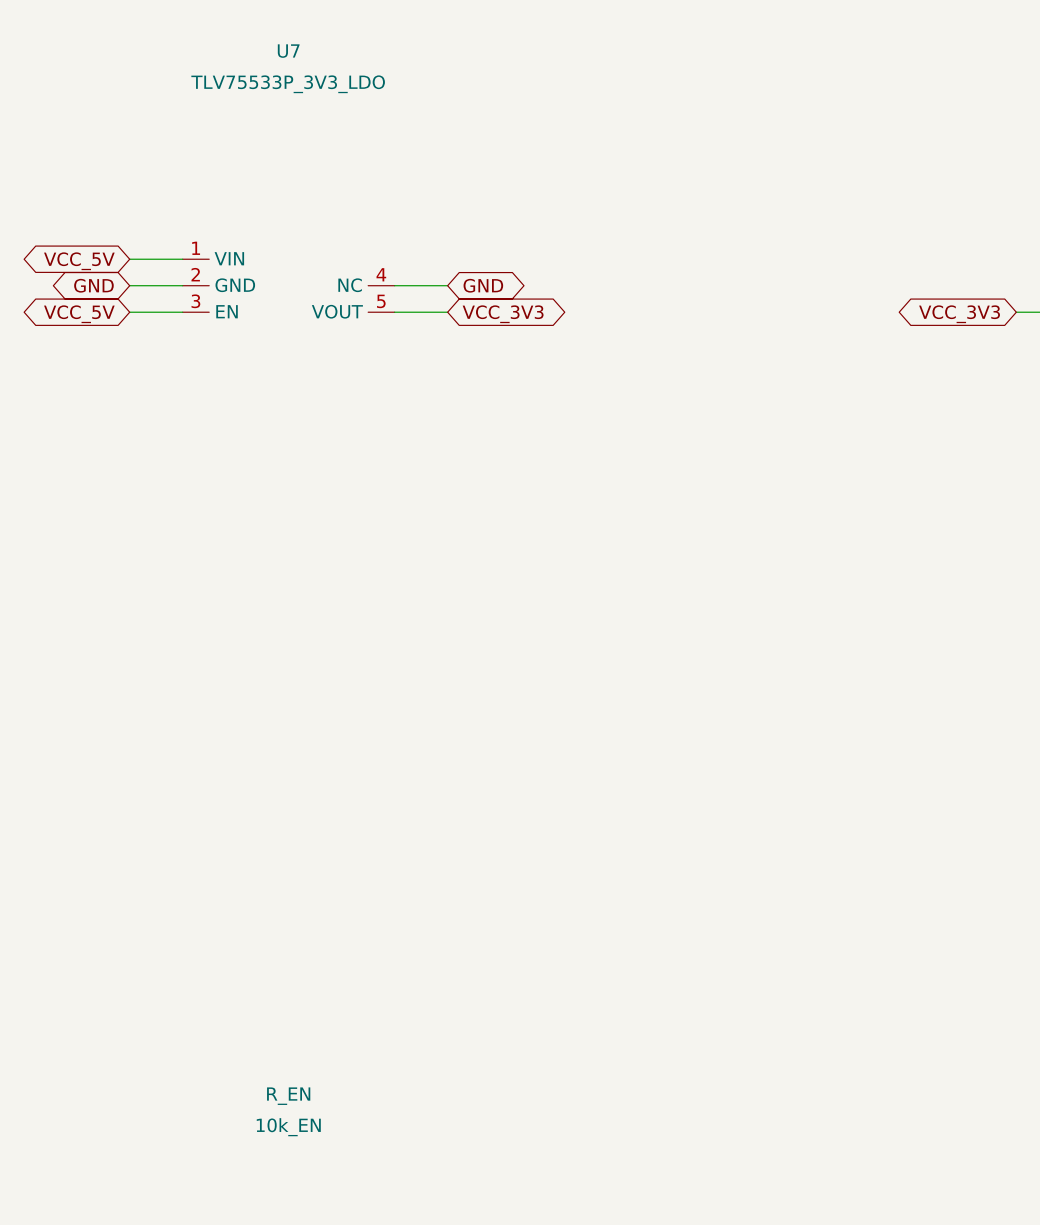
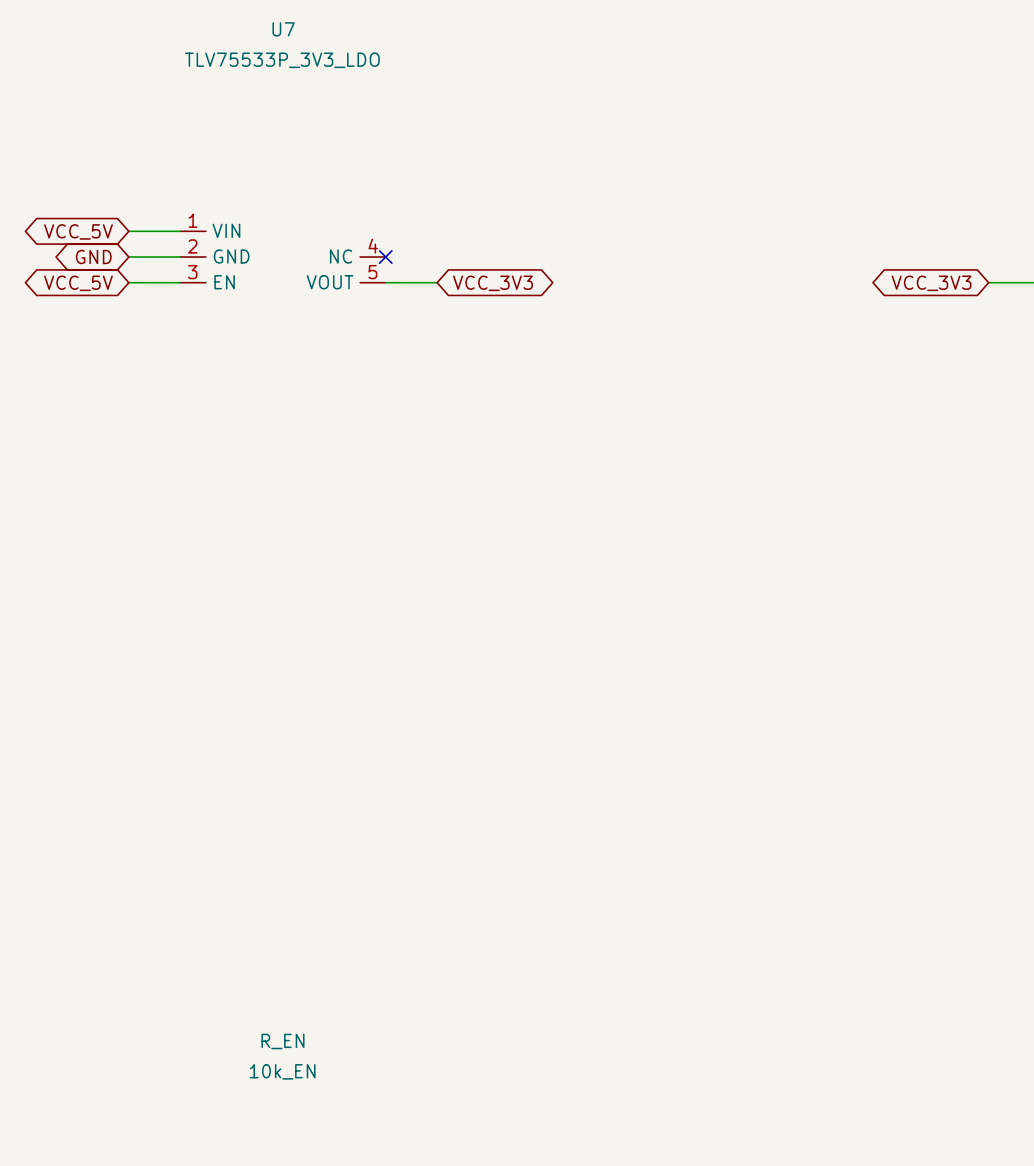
wire: (394, 285) (447, 285) -> none
no-connect mark: none -> (385, 257)
global label: GND (483, 285) -> none

